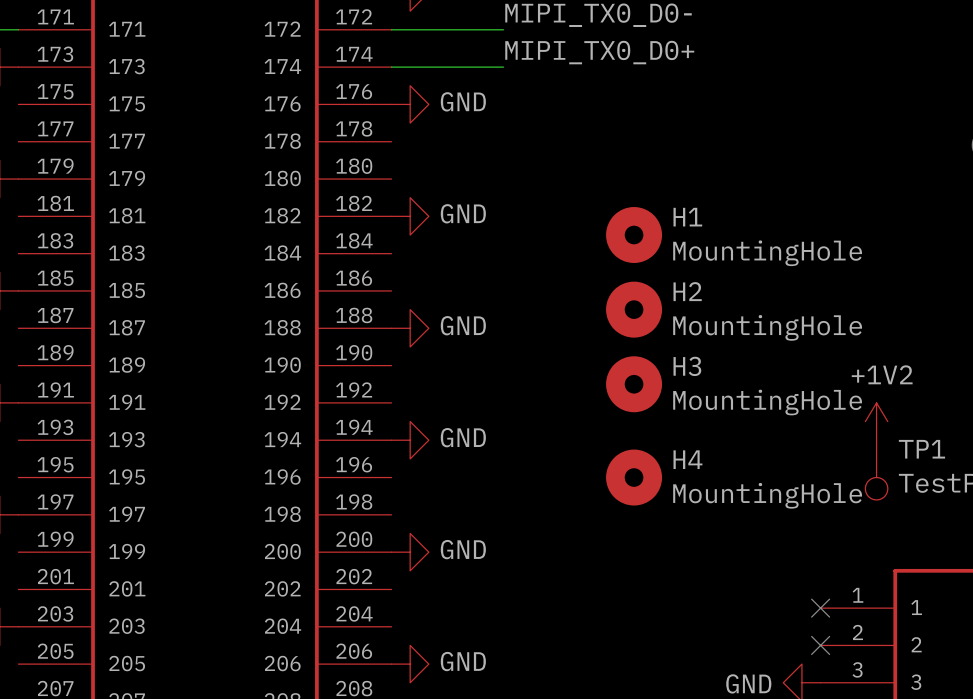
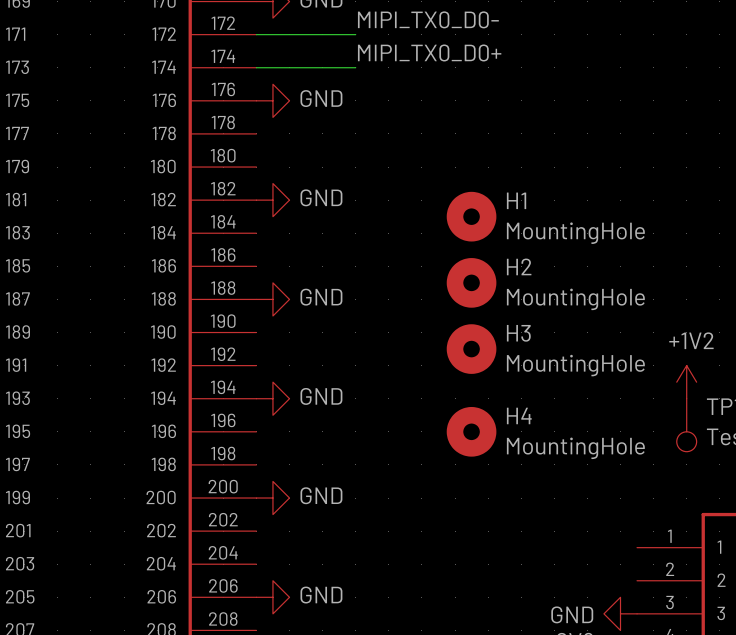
no-connect mark: (820, 608) -> none
no-connect mark: (820, 645) -> none

